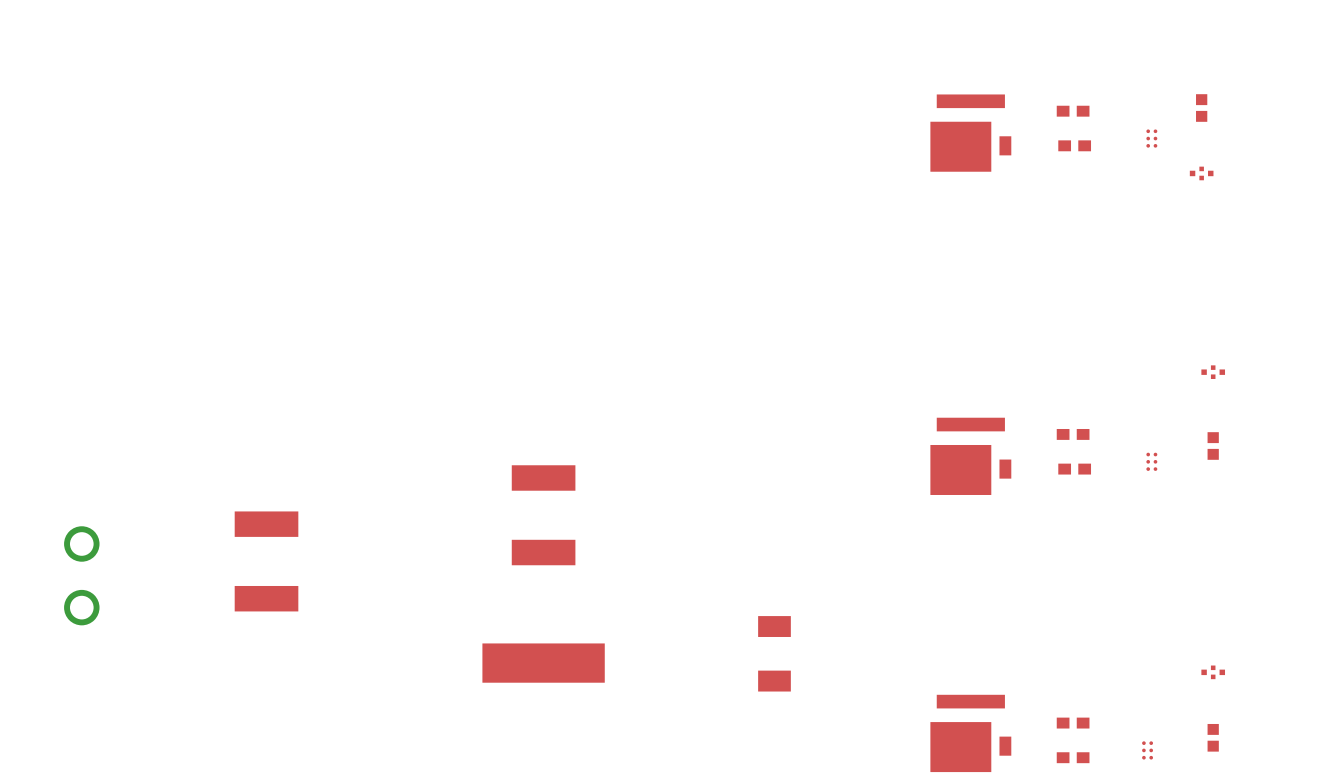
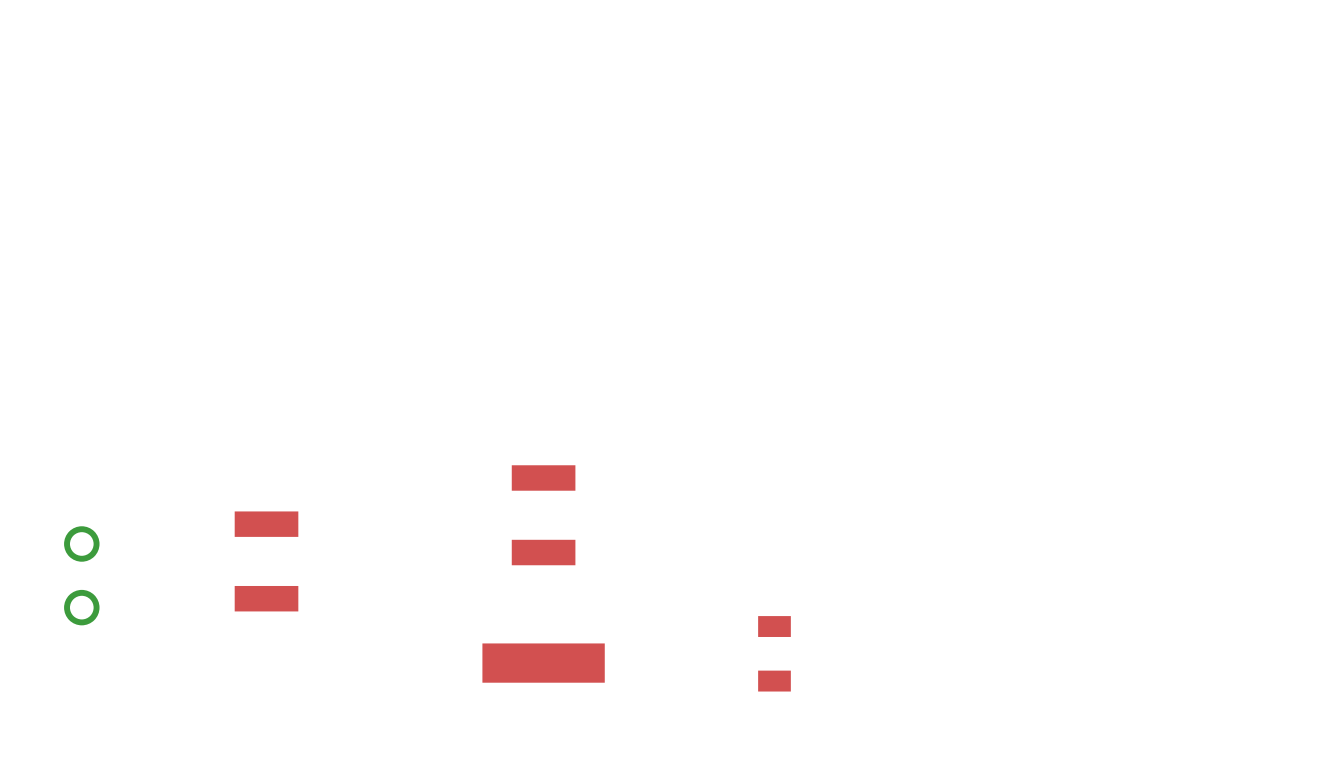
part: (1201, 108) -> none
part: (1073, 111) -> none
part: (970, 133) -> none
part: (1151, 138) -> none
part: (1074, 145) -> none
part: (1201, 173) -> none
part: (1213, 372) -> none
part: (1073, 434) -> none
part: (1213, 445) -> none
part: (970, 456) -> none
part: (1151, 461) -> none
part: (1074, 469) -> none
part: (1213, 672) -> none
part: (1073, 723) -> none
part: (970, 733) -> none
part: (1213, 737) -> none
part: (1147, 750) -> none
part: (1073, 757) -> none

